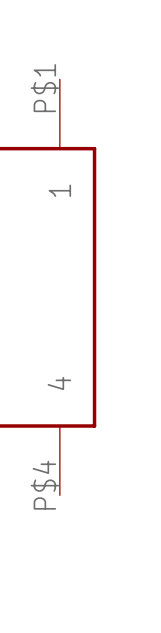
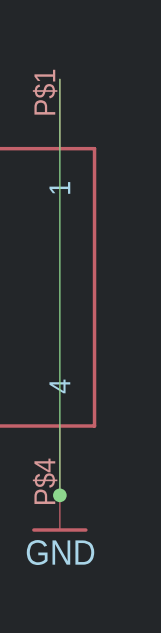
wire: none -> (59, 79) (59, 495)
junction: none -> (59, 495)
power symbol: none -> GND (59, 513)

